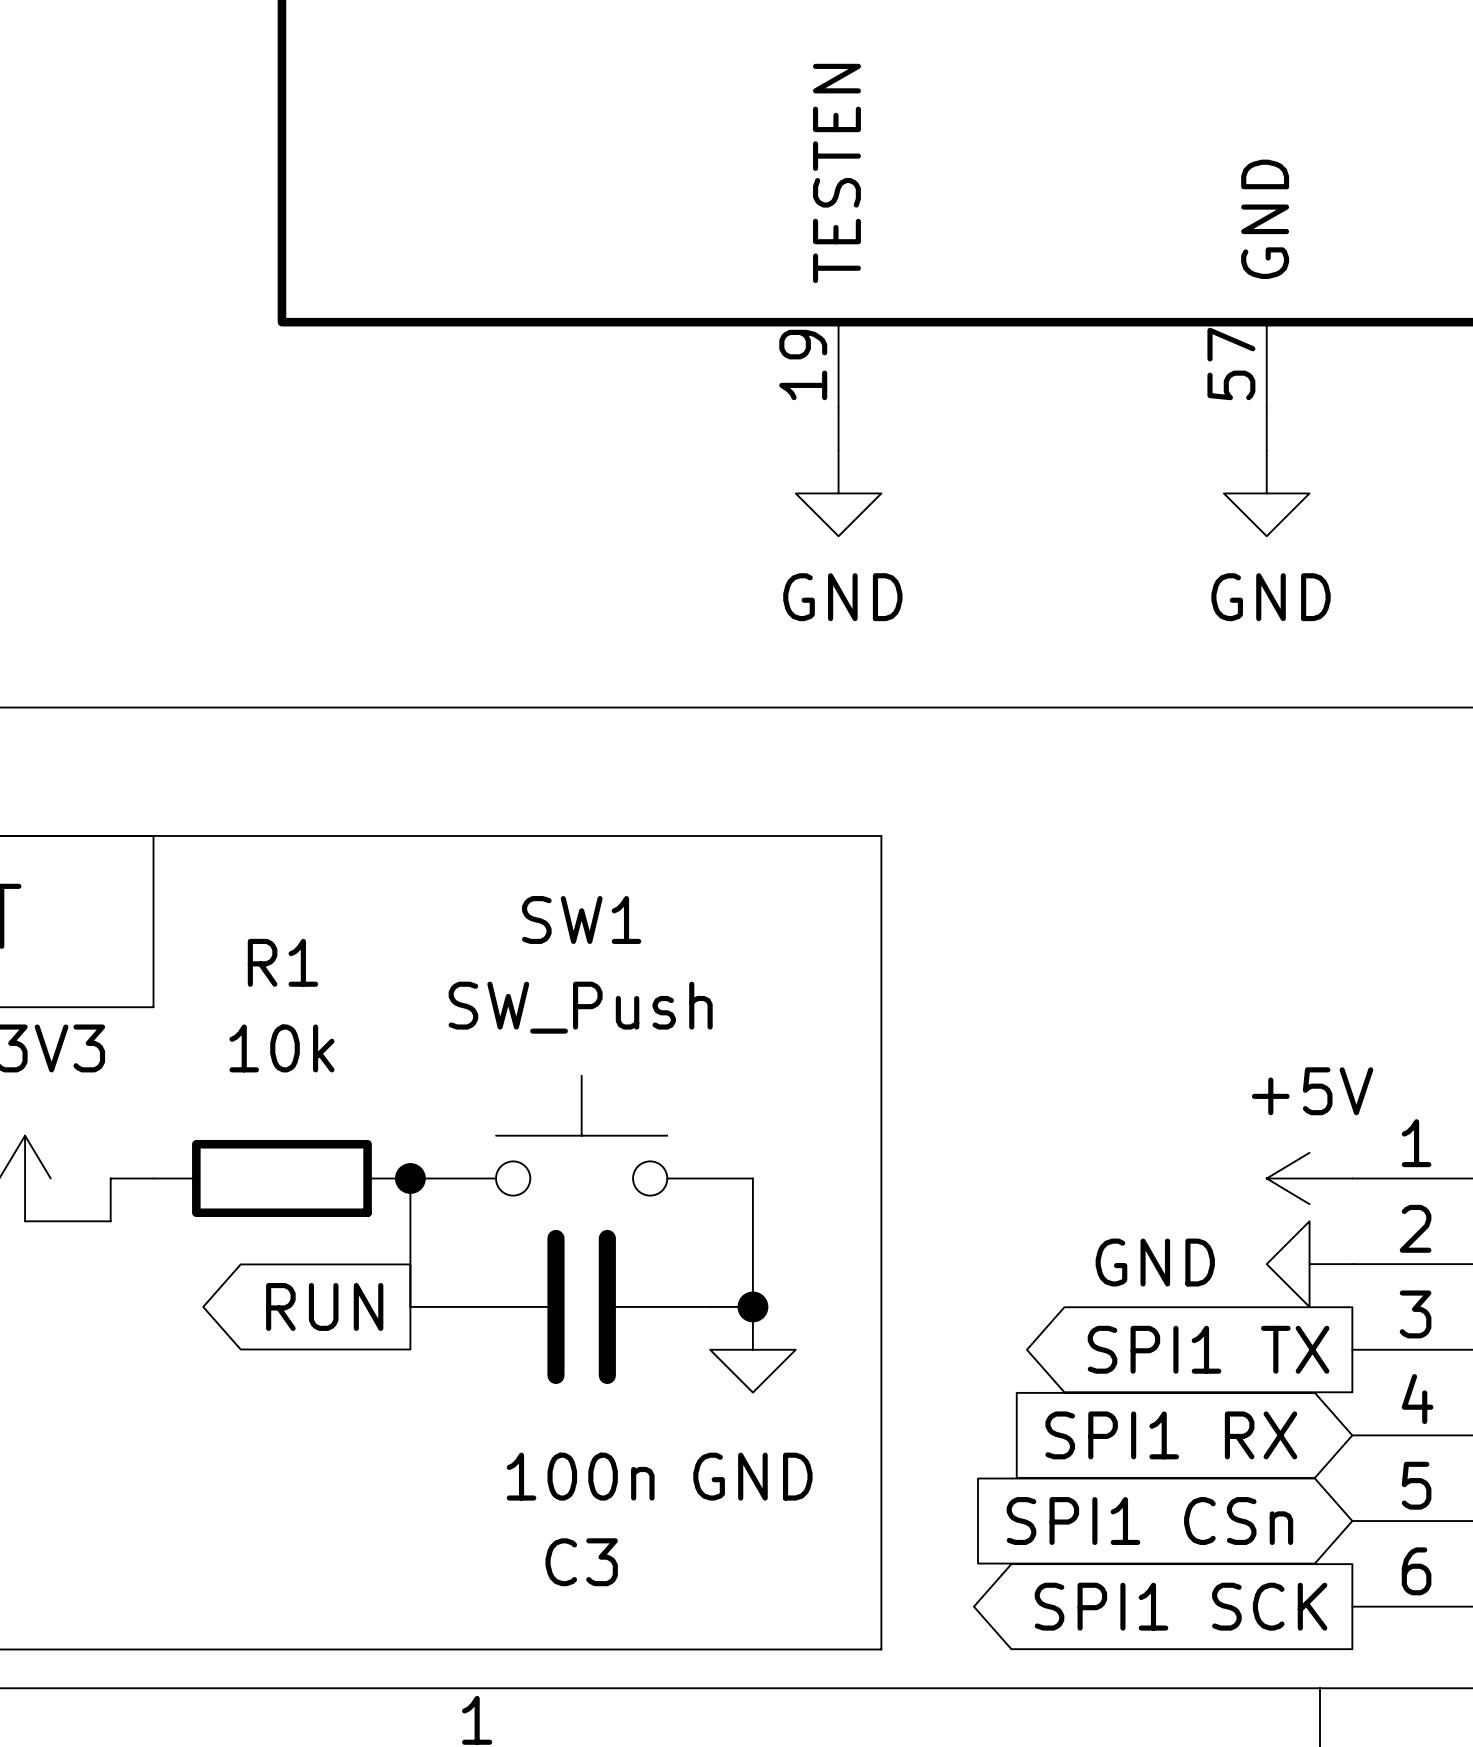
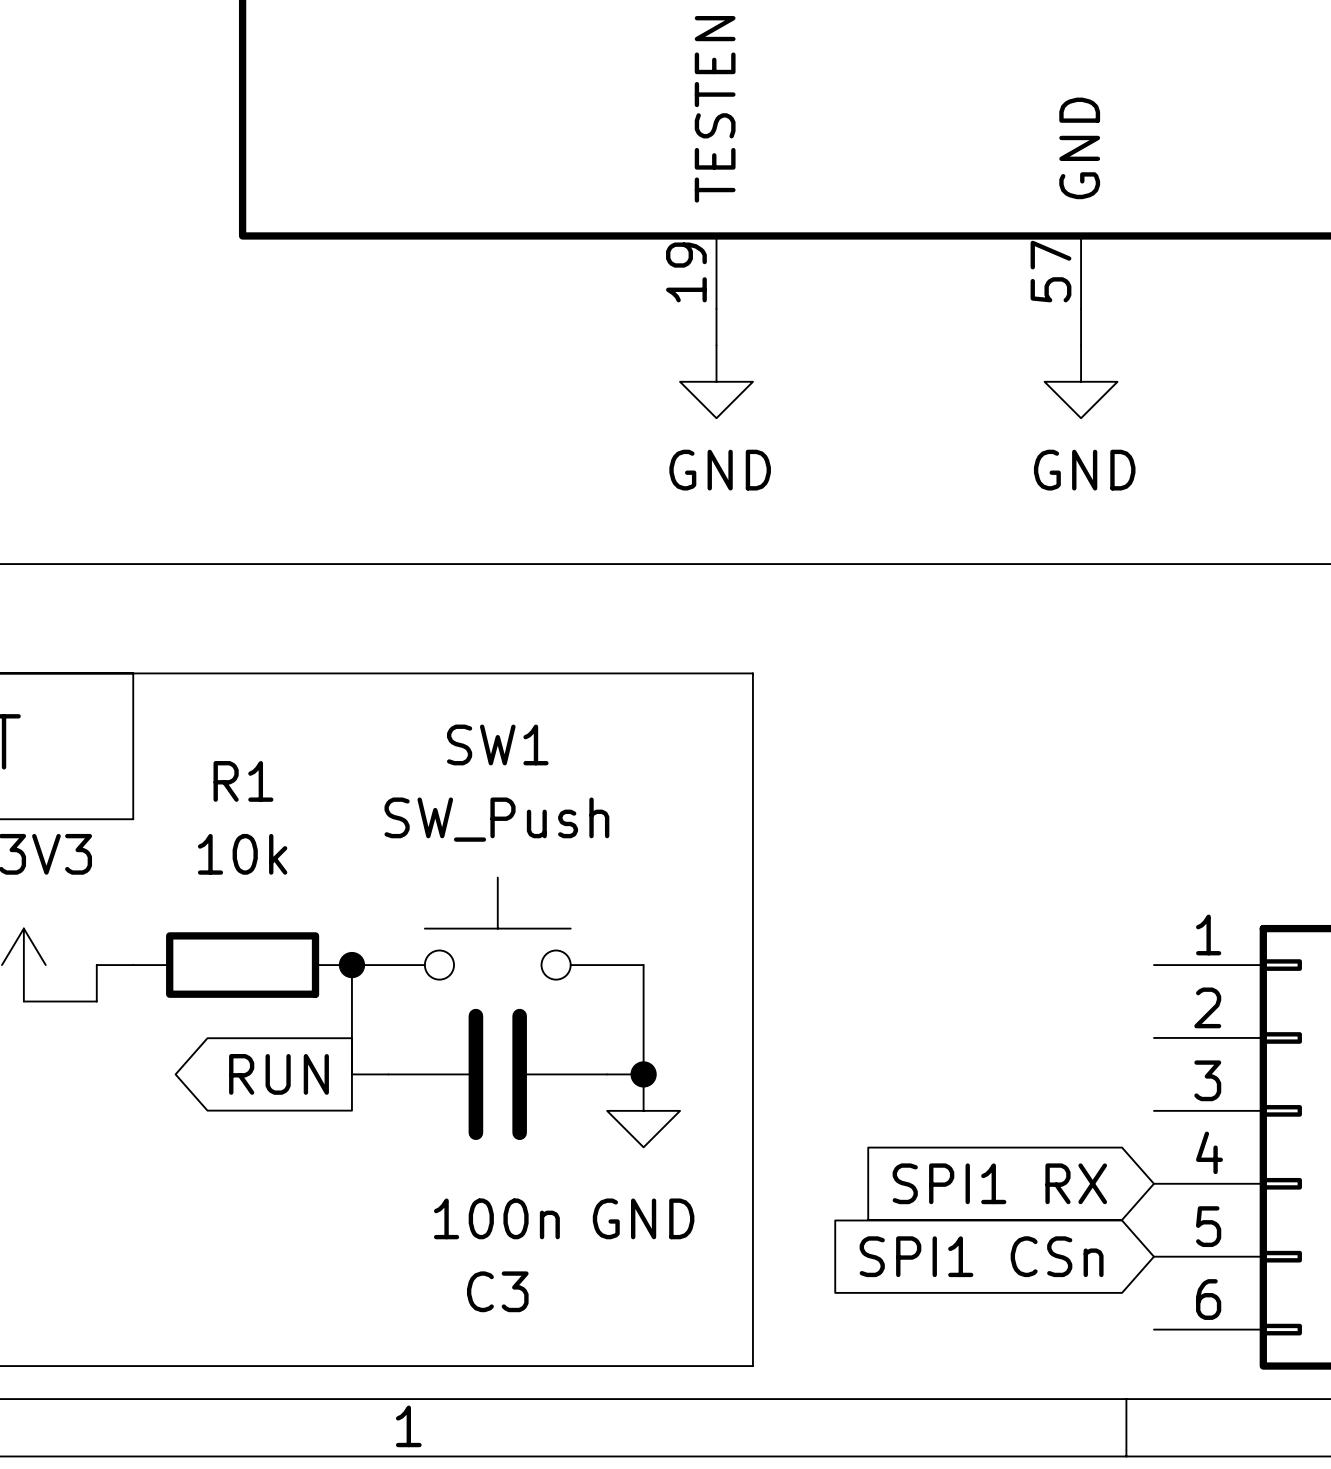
power symbol: +5V (1309, 1178) -> none
power symbol: GND (1309, 1264) -> none
global label: SPI1 TX (1208, 1349) -> none
global label: SPI1 SCK (1181, 1606) -> none

